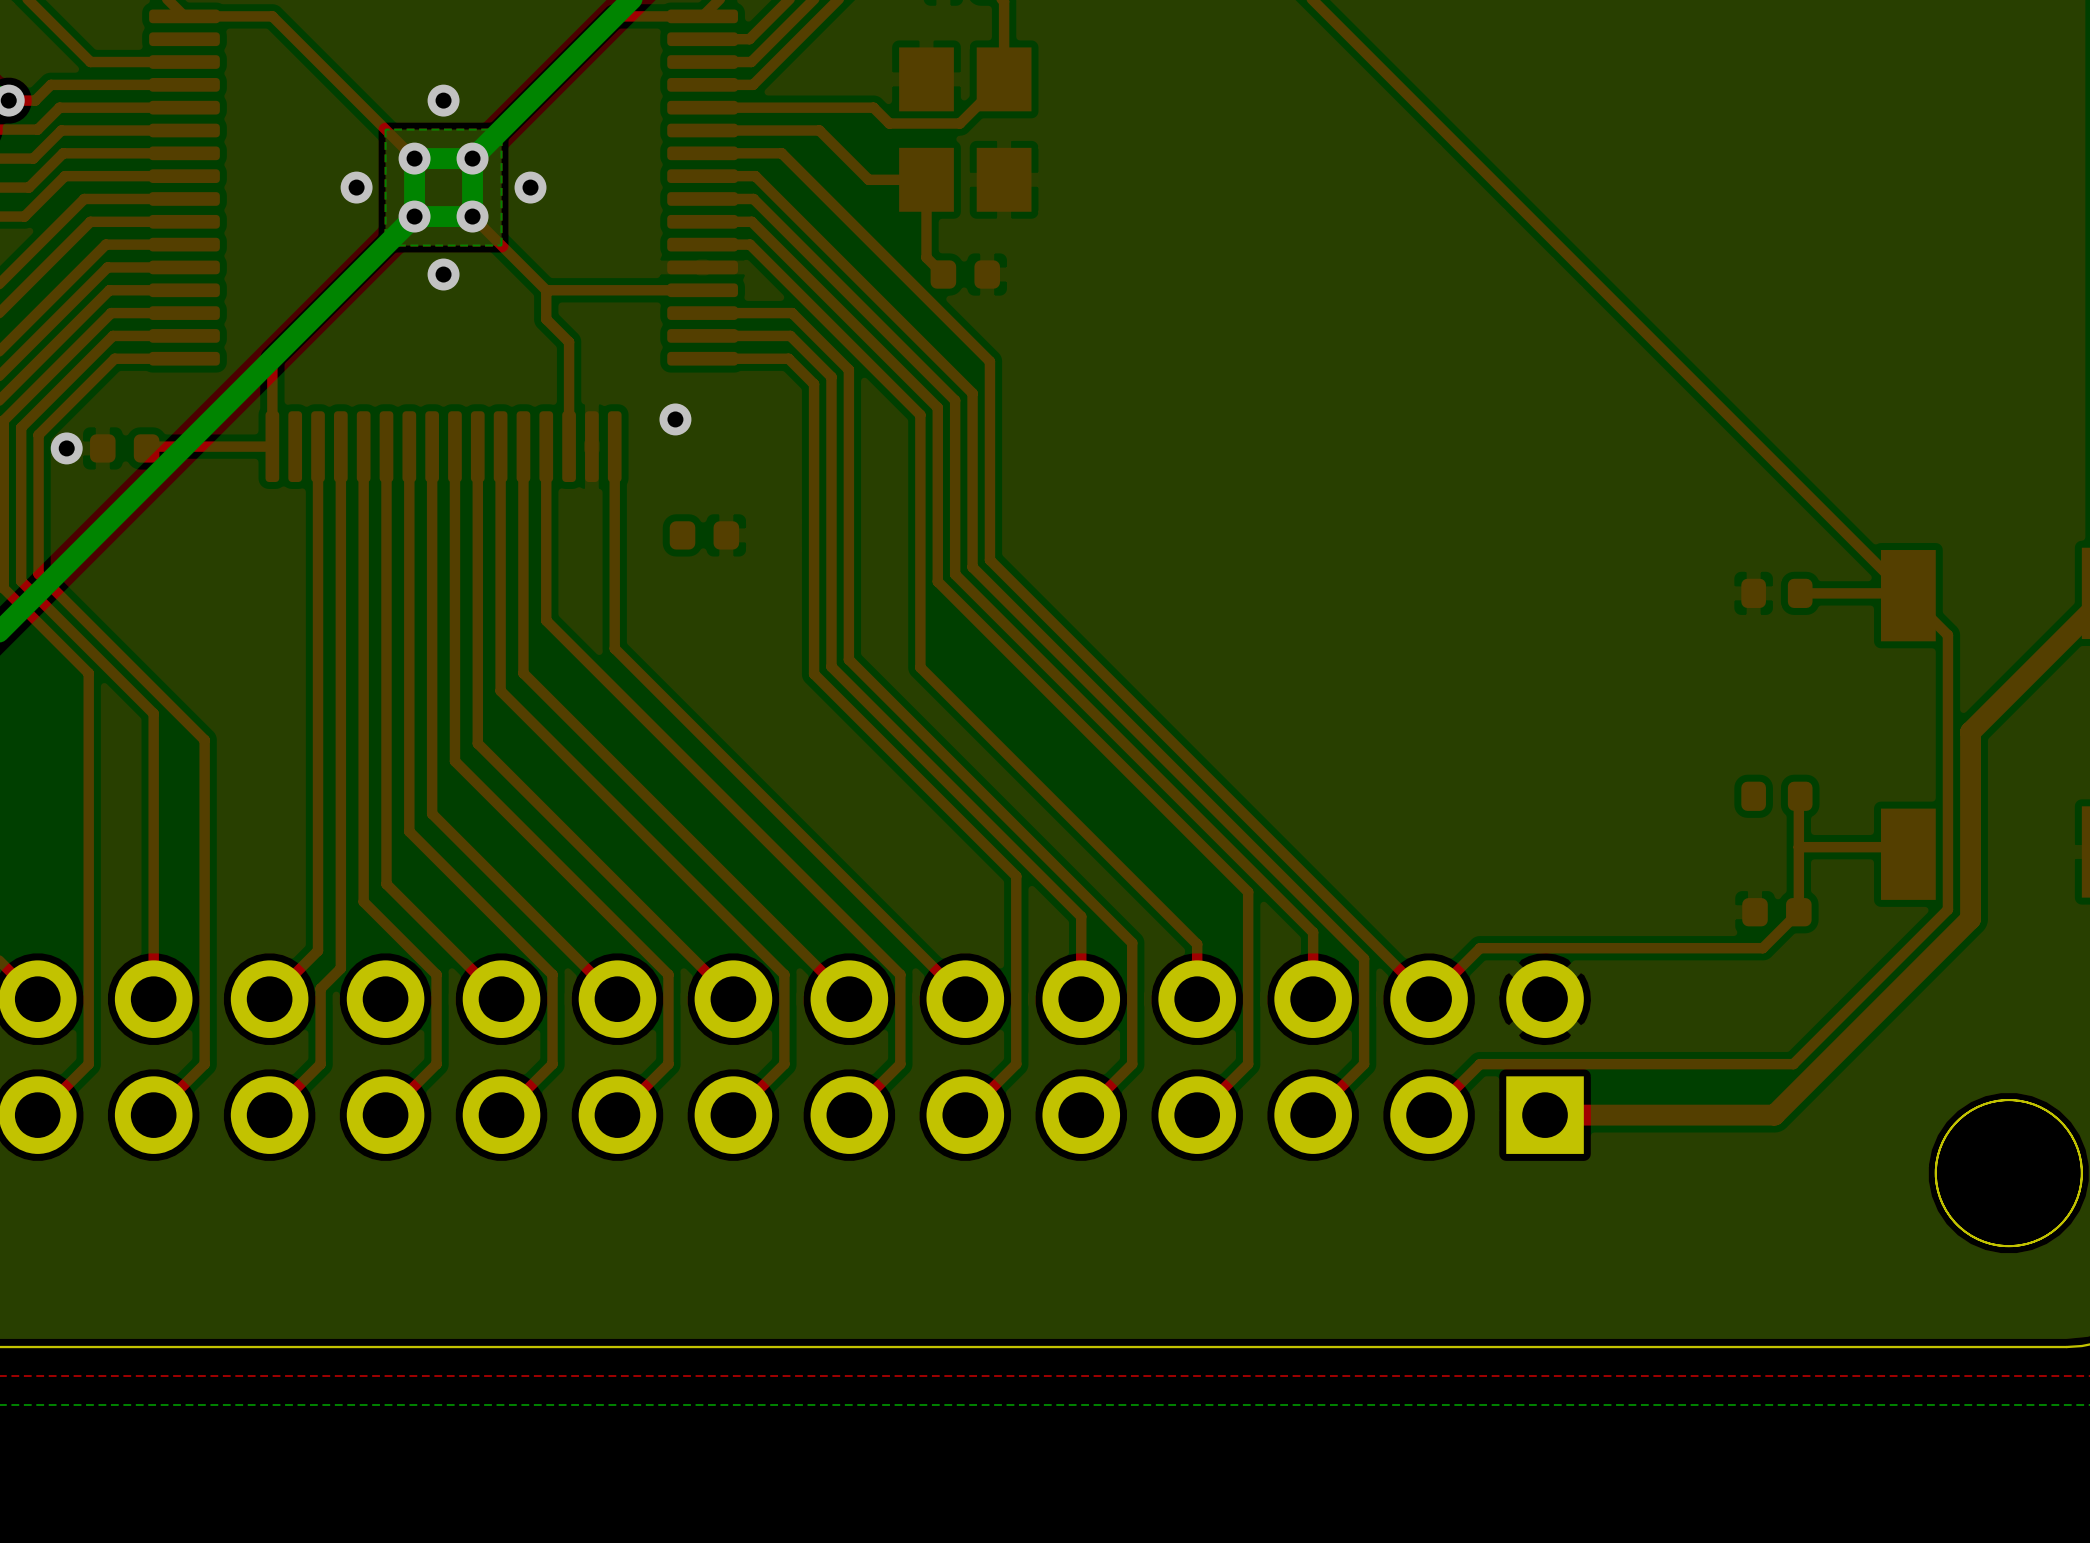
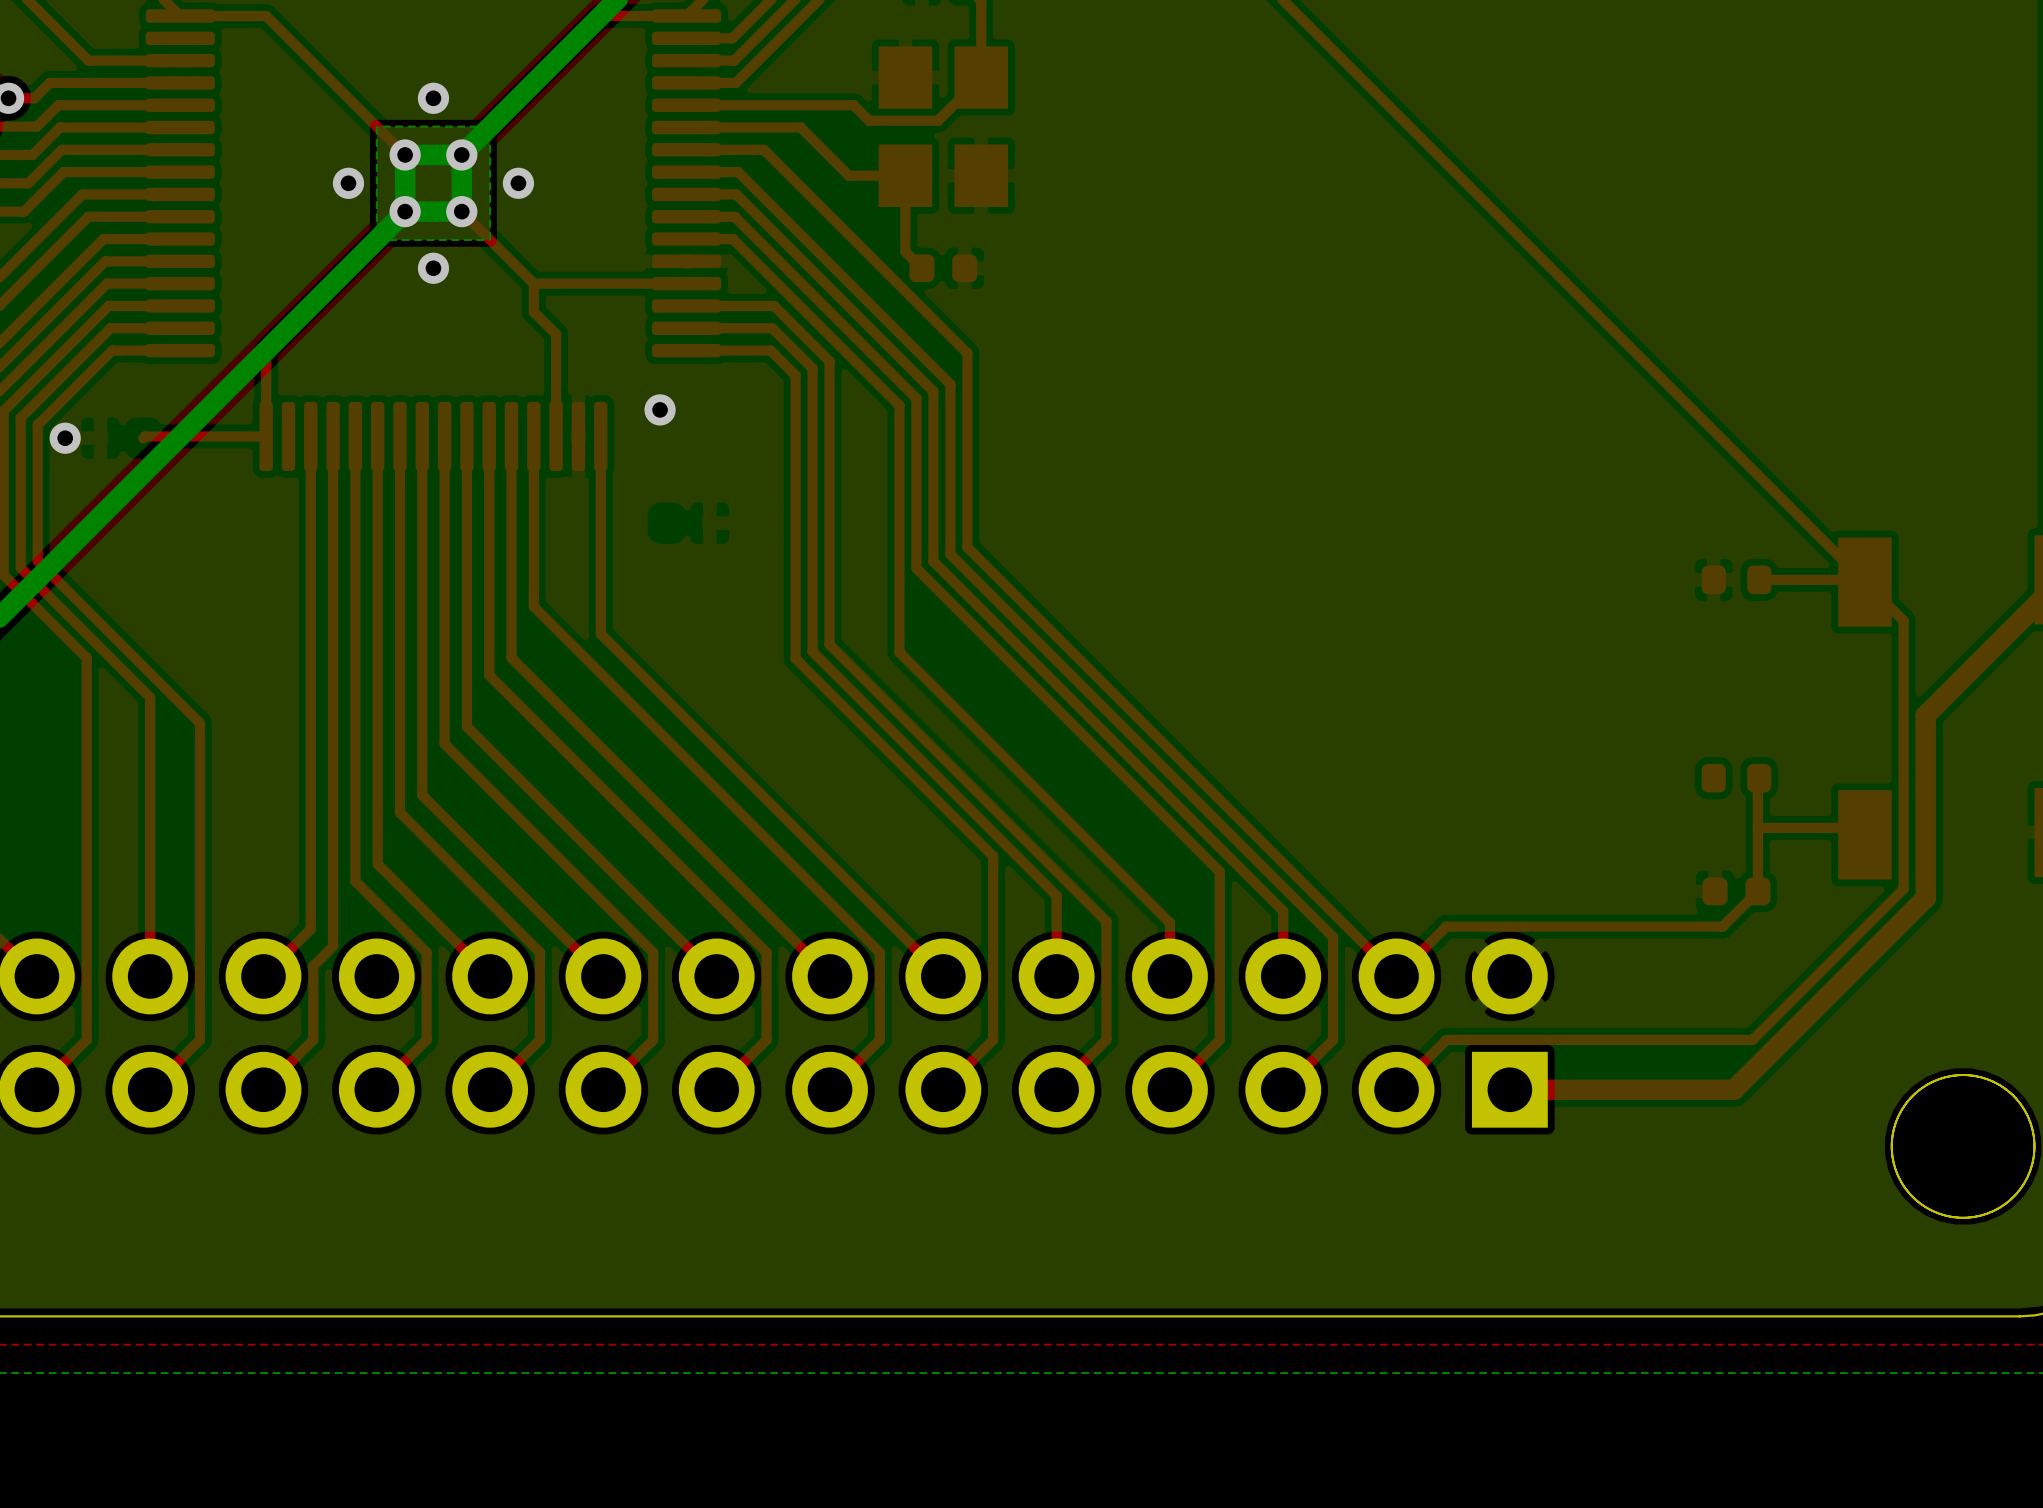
part: (124, 448) -> none
part: (704, 535) -> none

